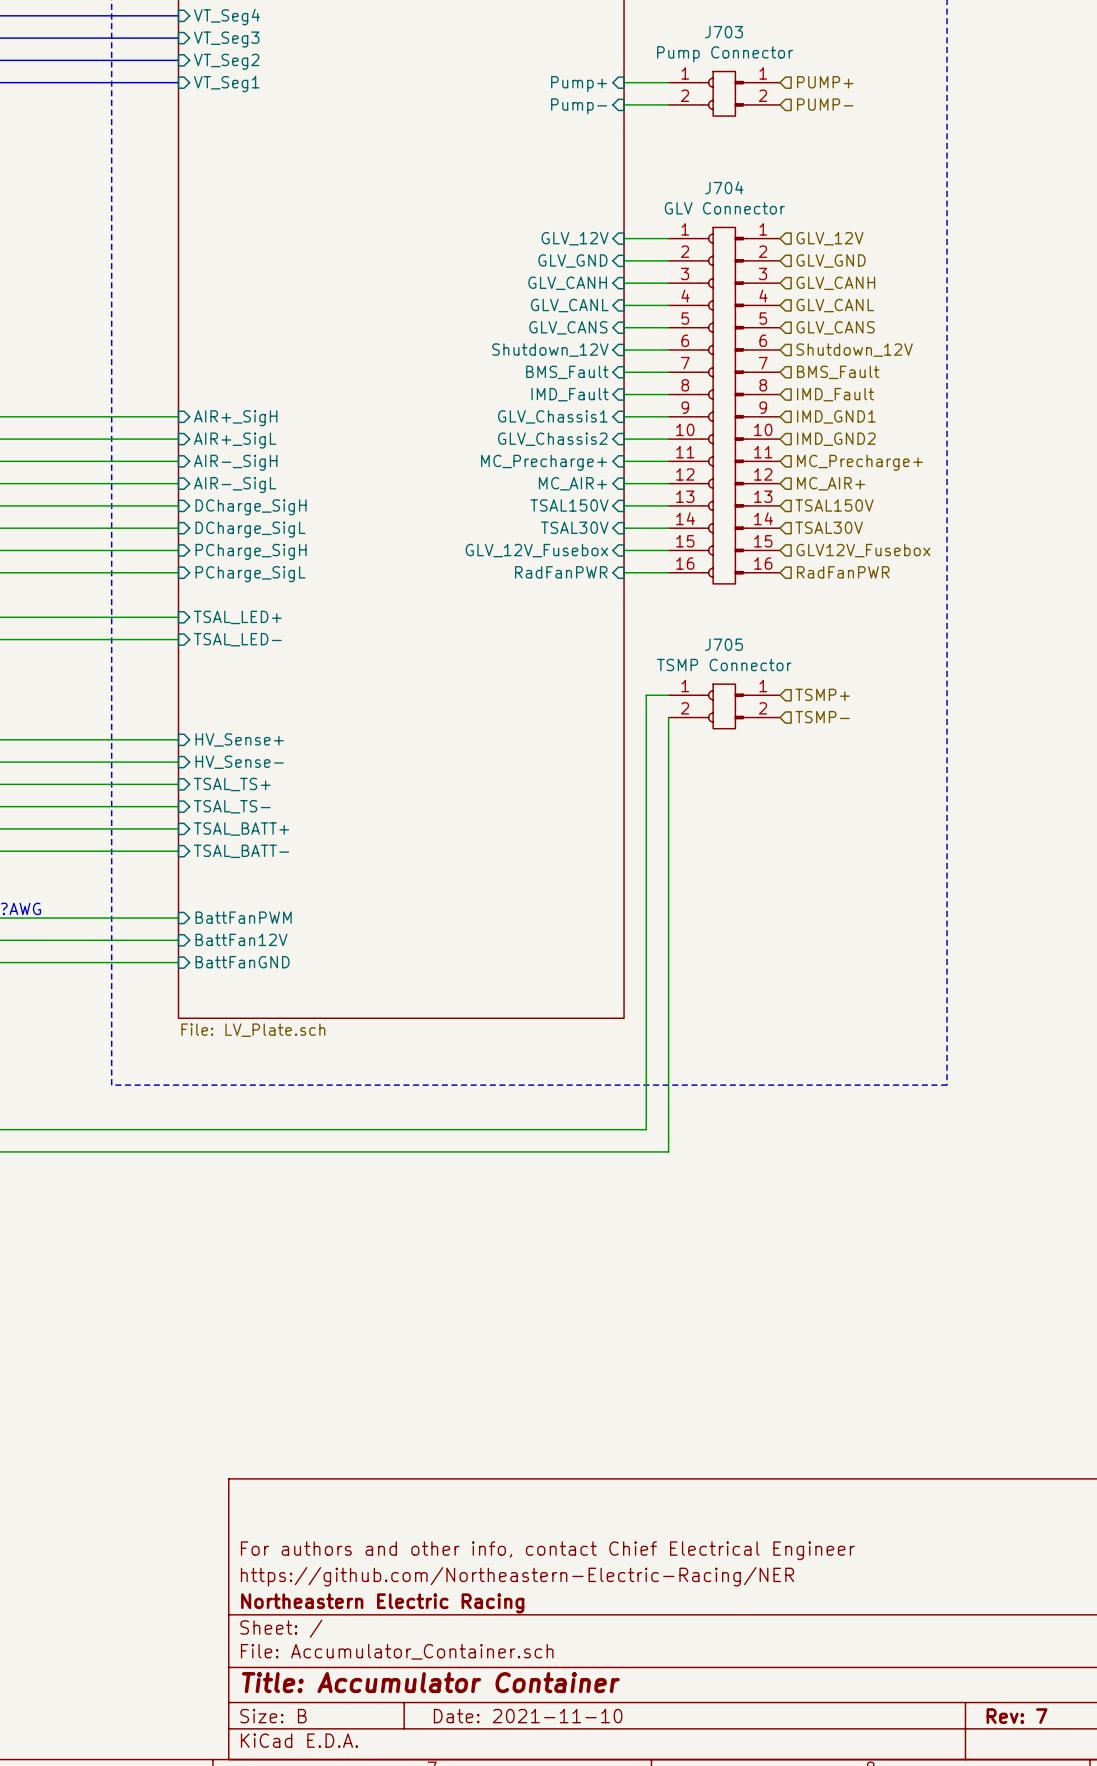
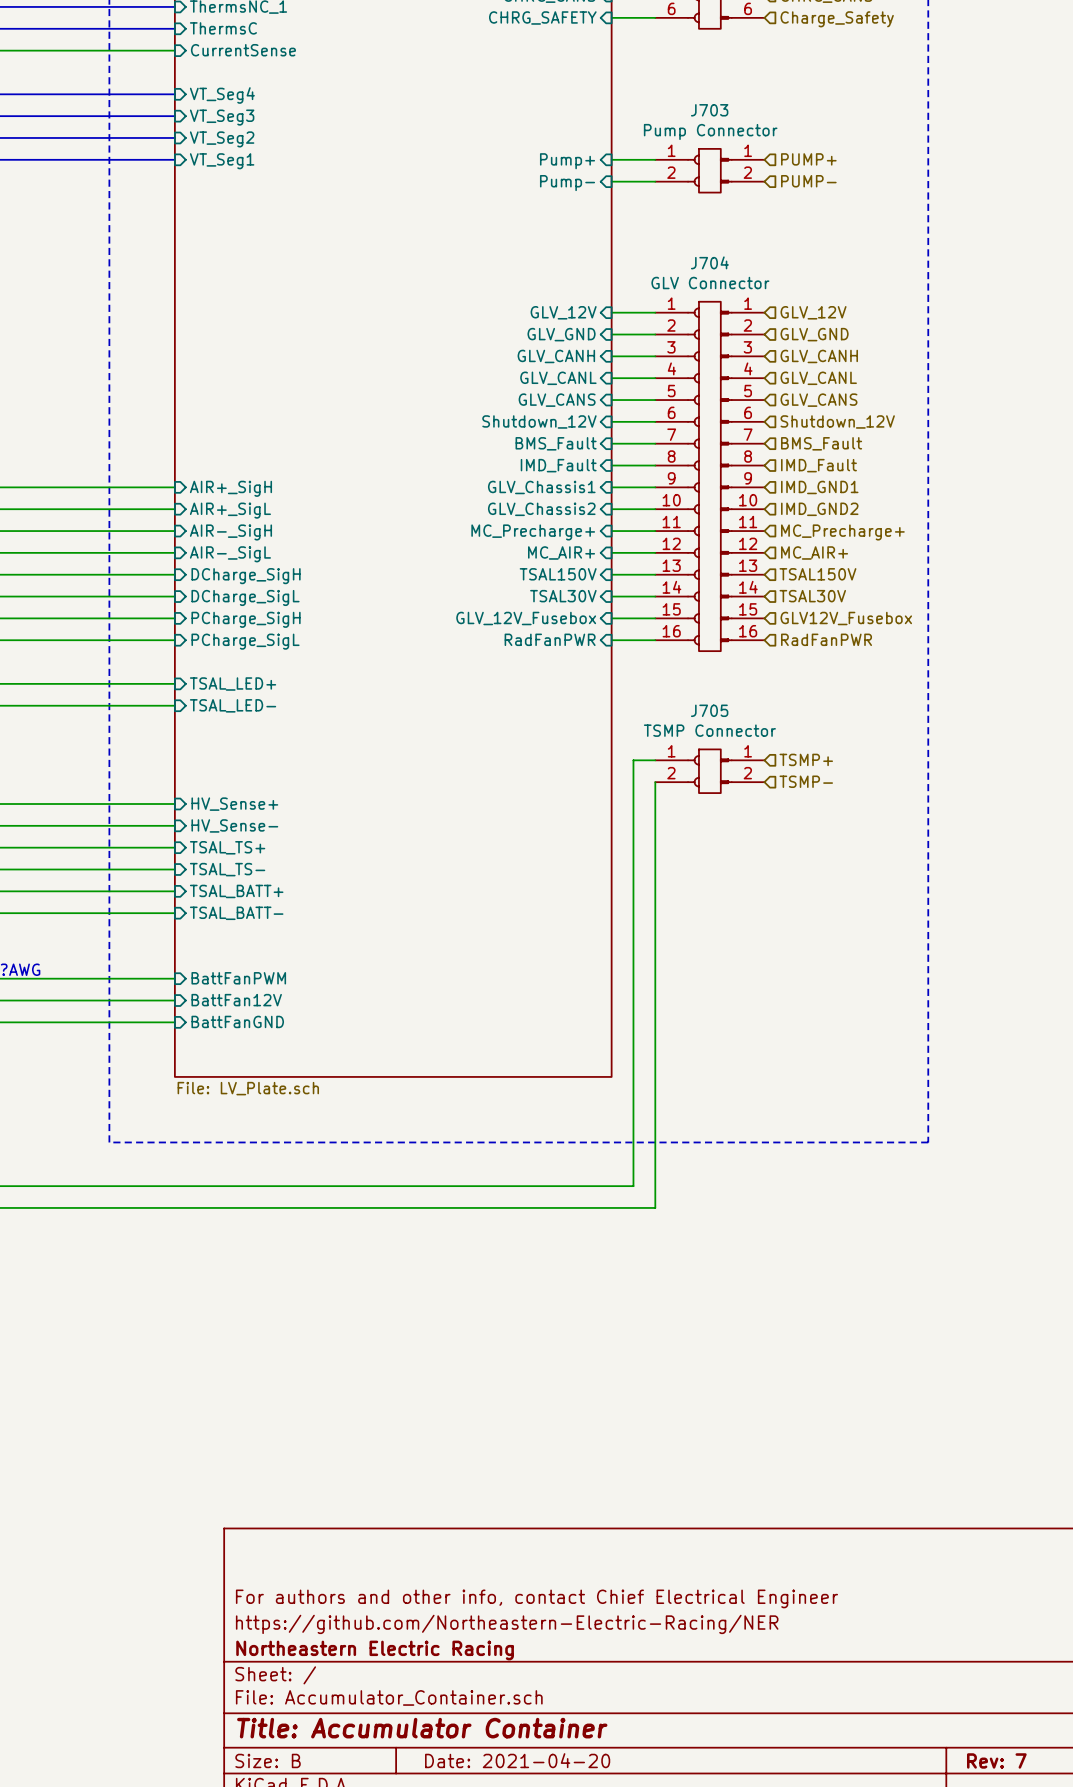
title block: Date: 2021-11-10 (528, 1716) -> Date: 2021-04-20 (517, 1760)

